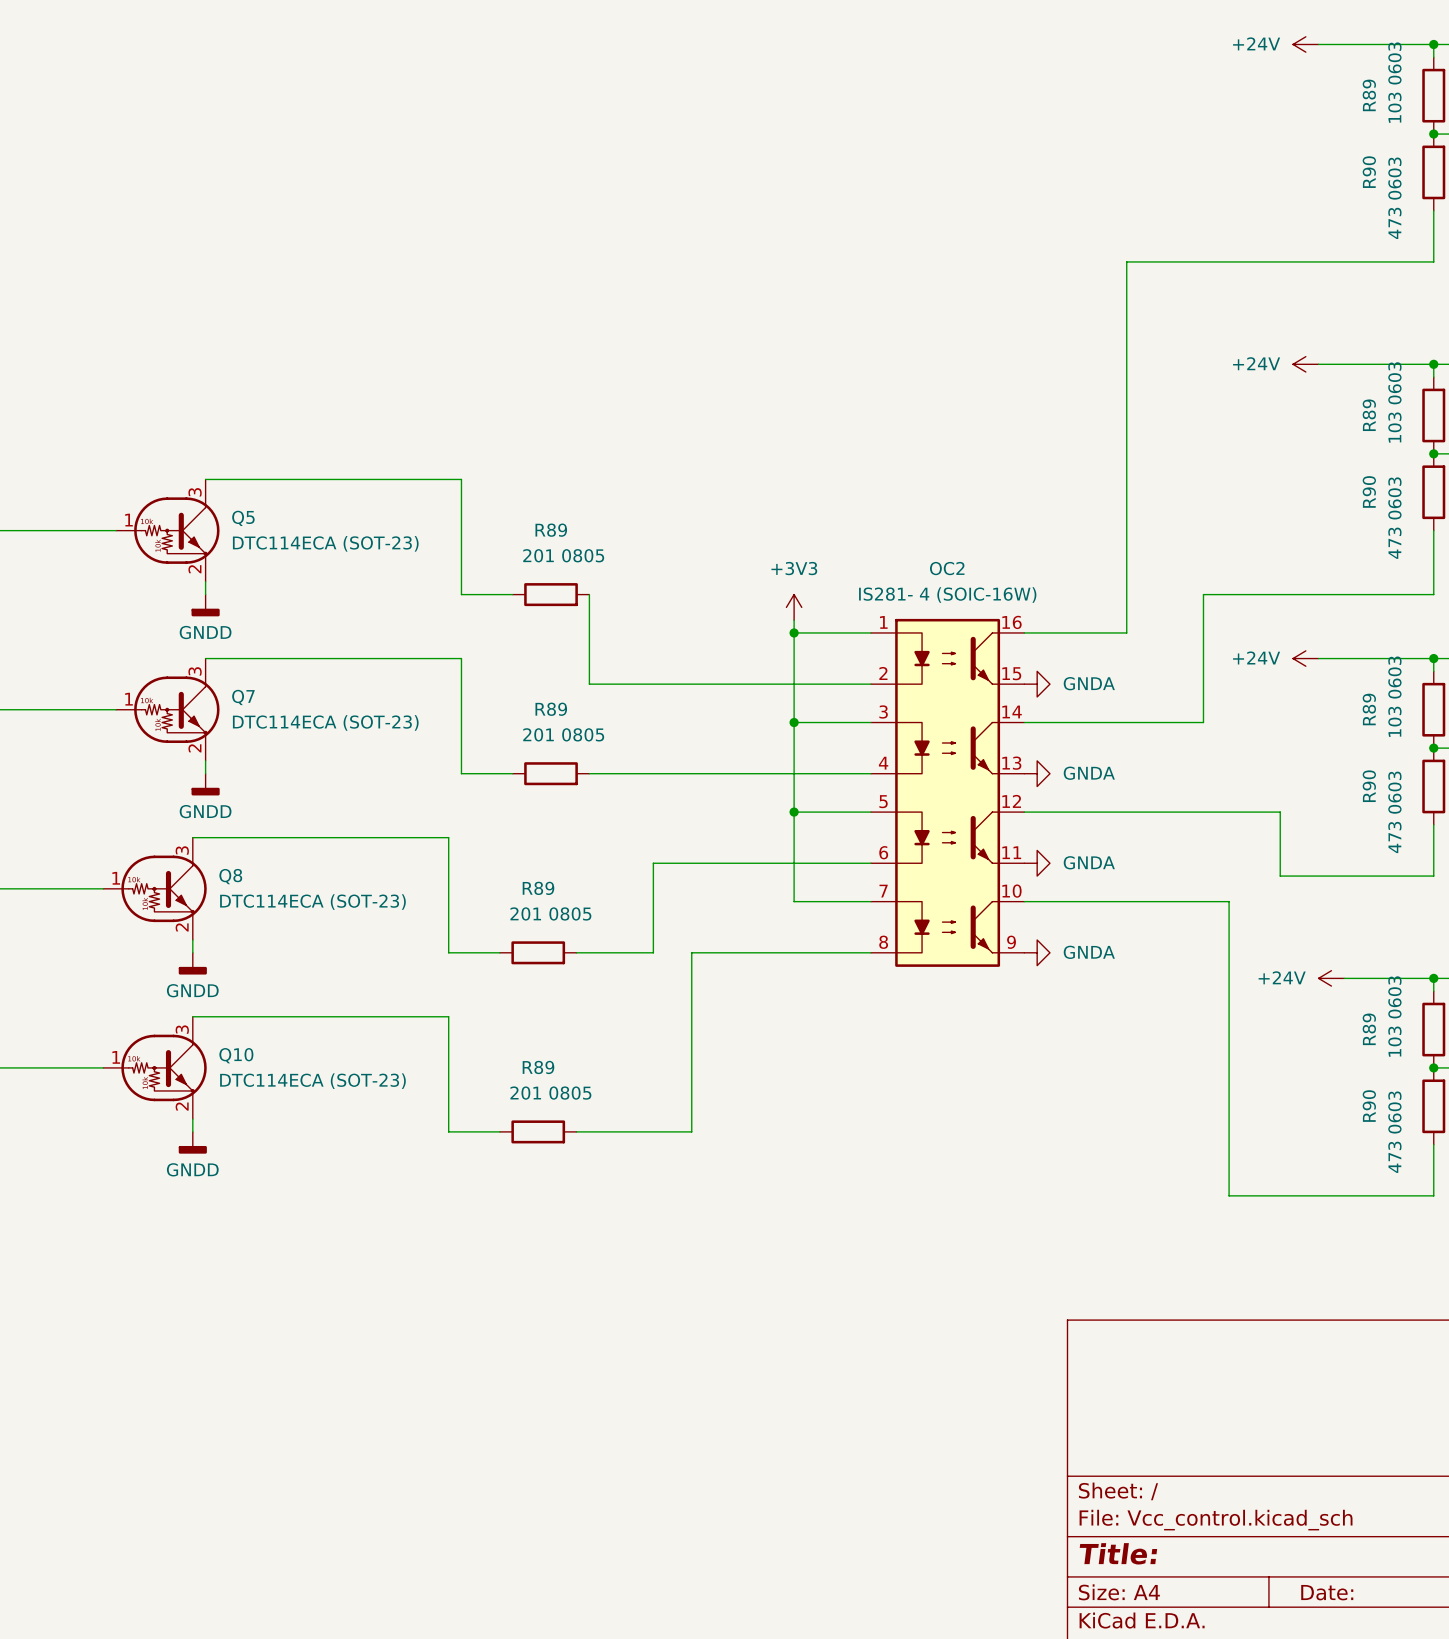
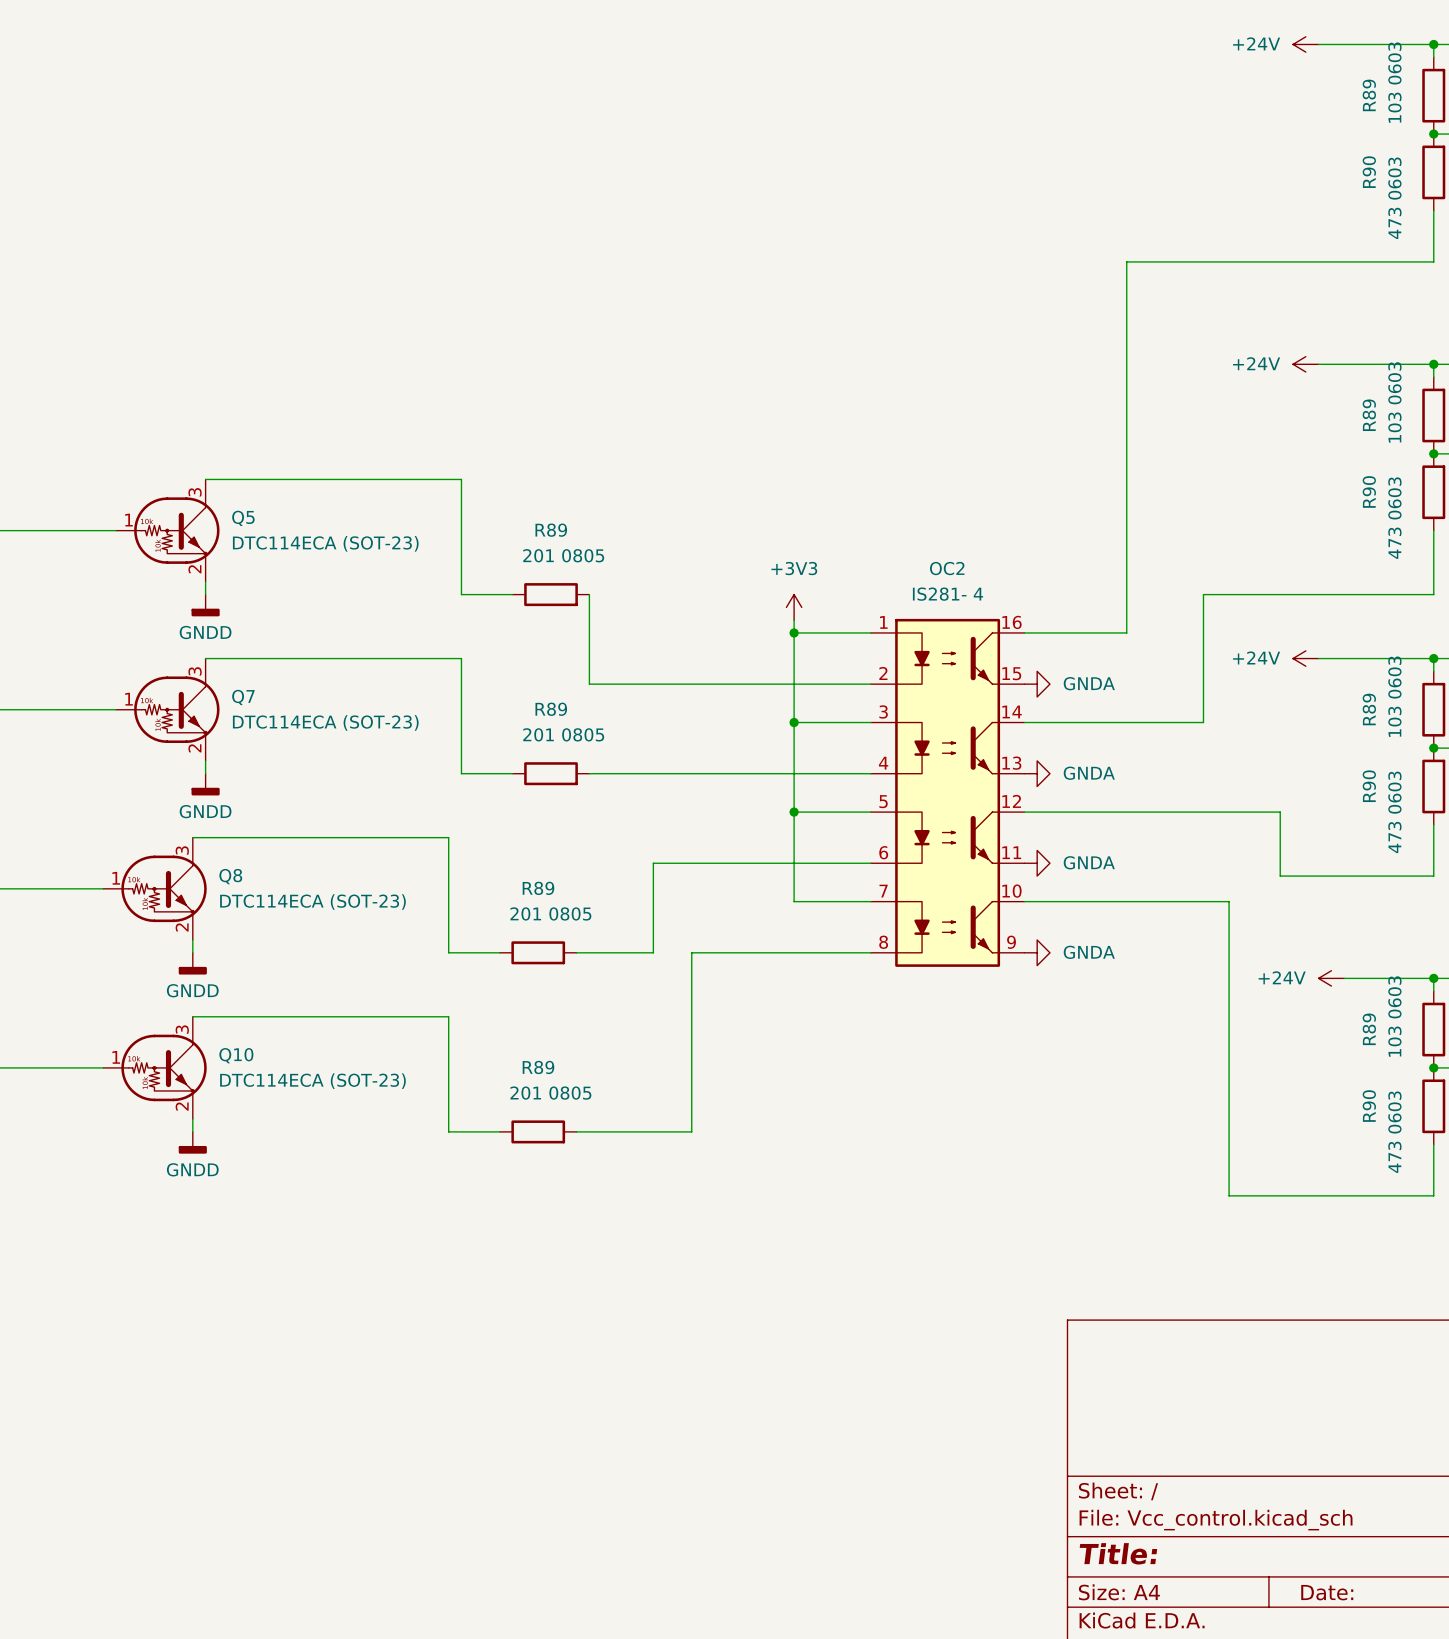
OC2 value: IS281- 4 (SOIC-16W) (947, 595) -> IS281- 4 (947, 594)

